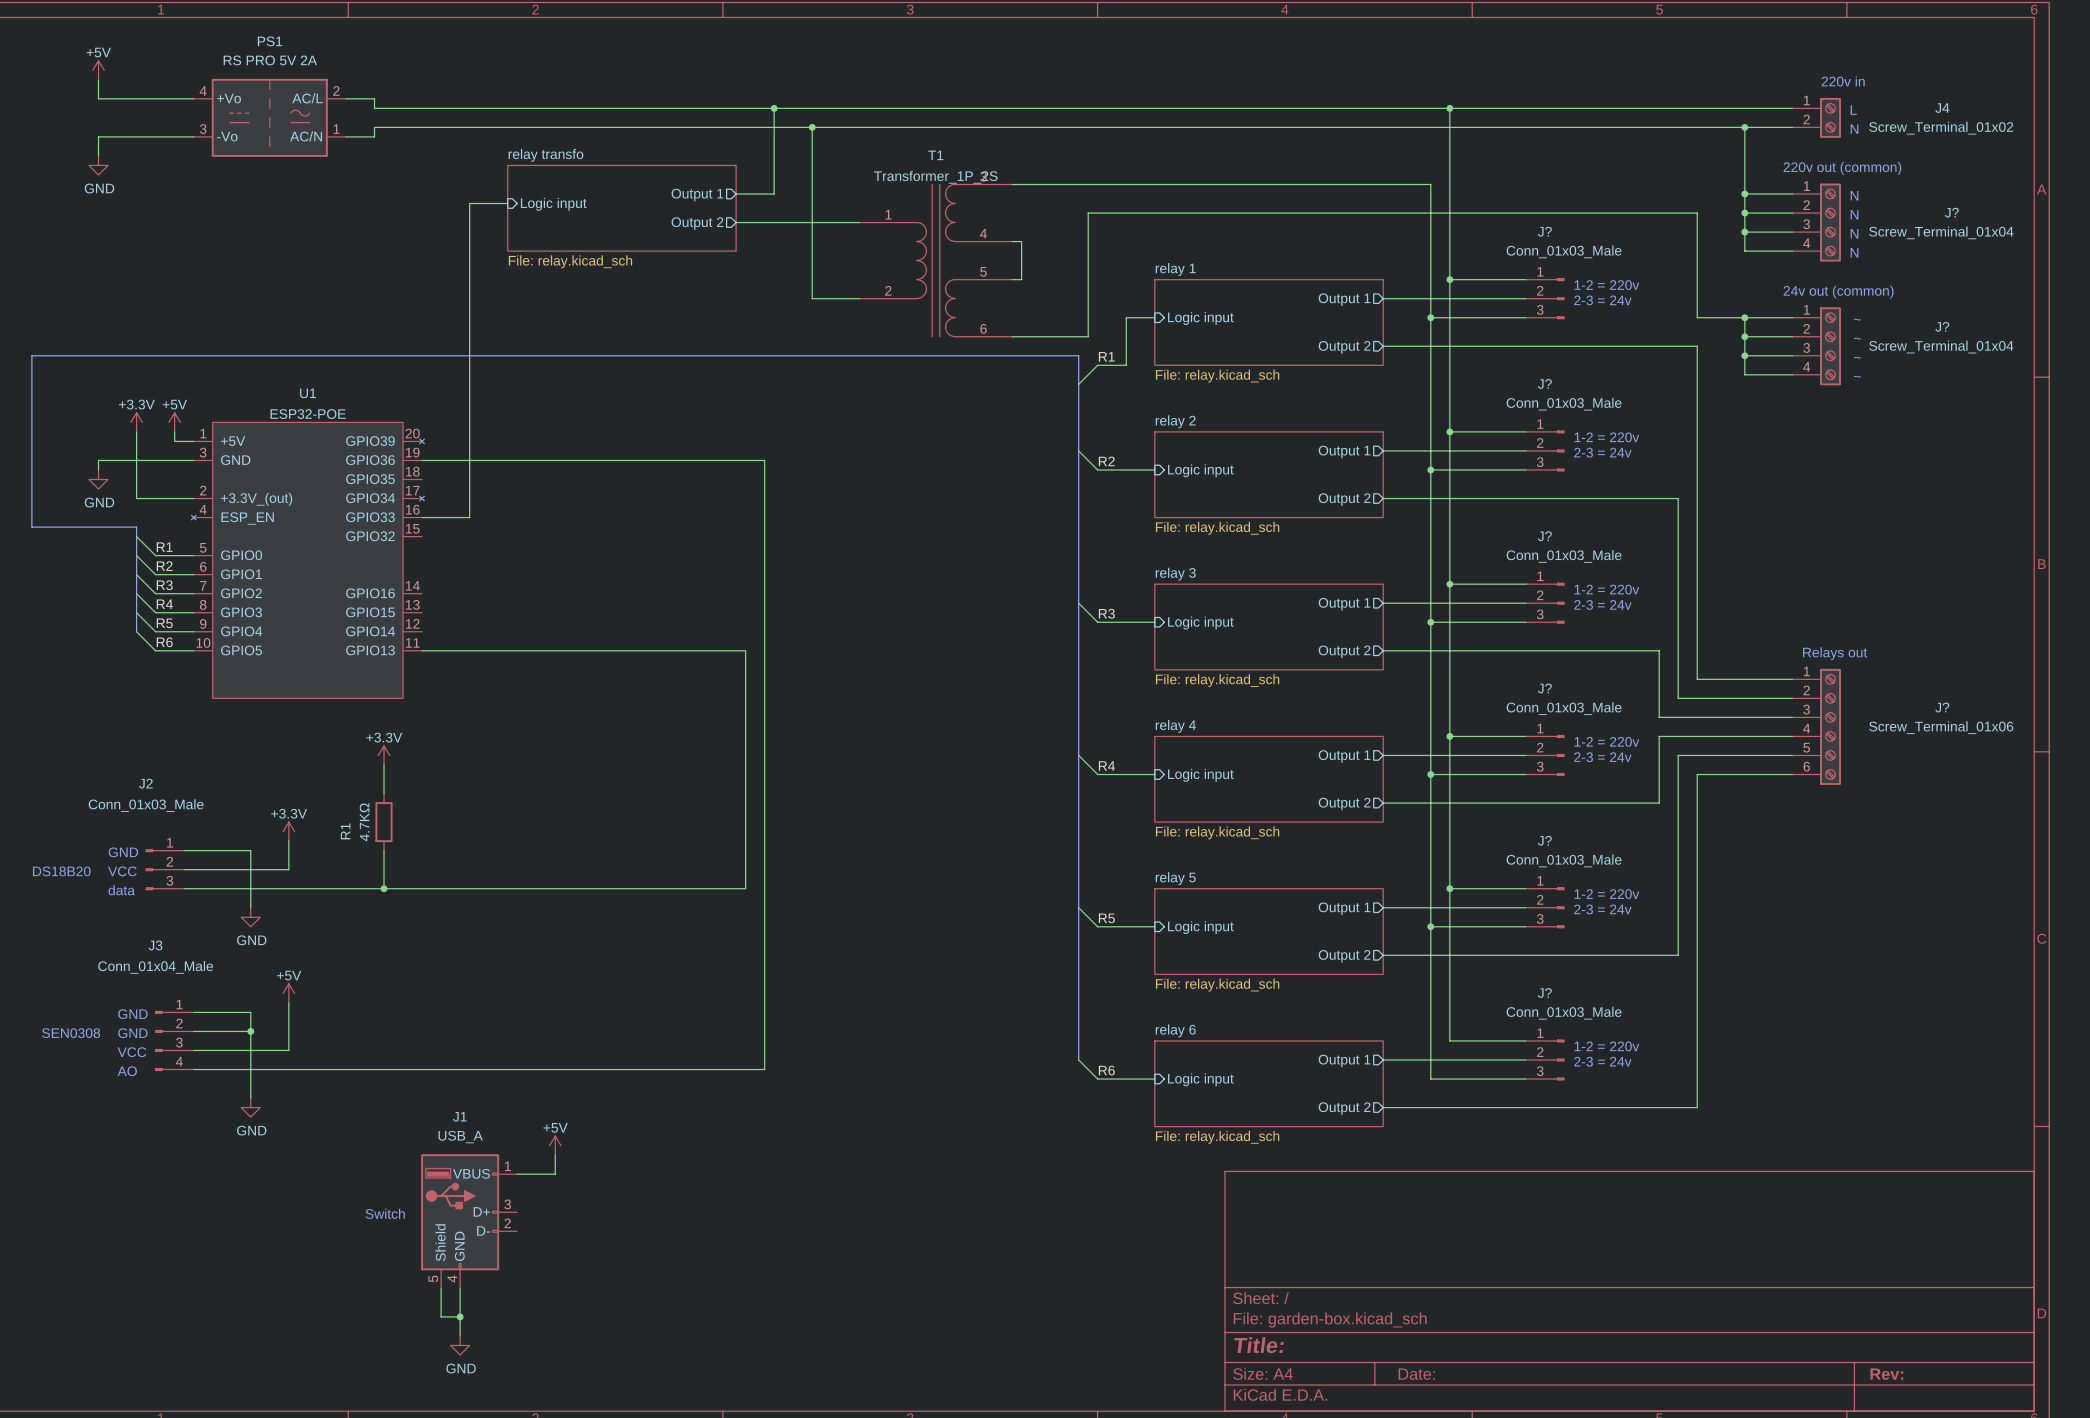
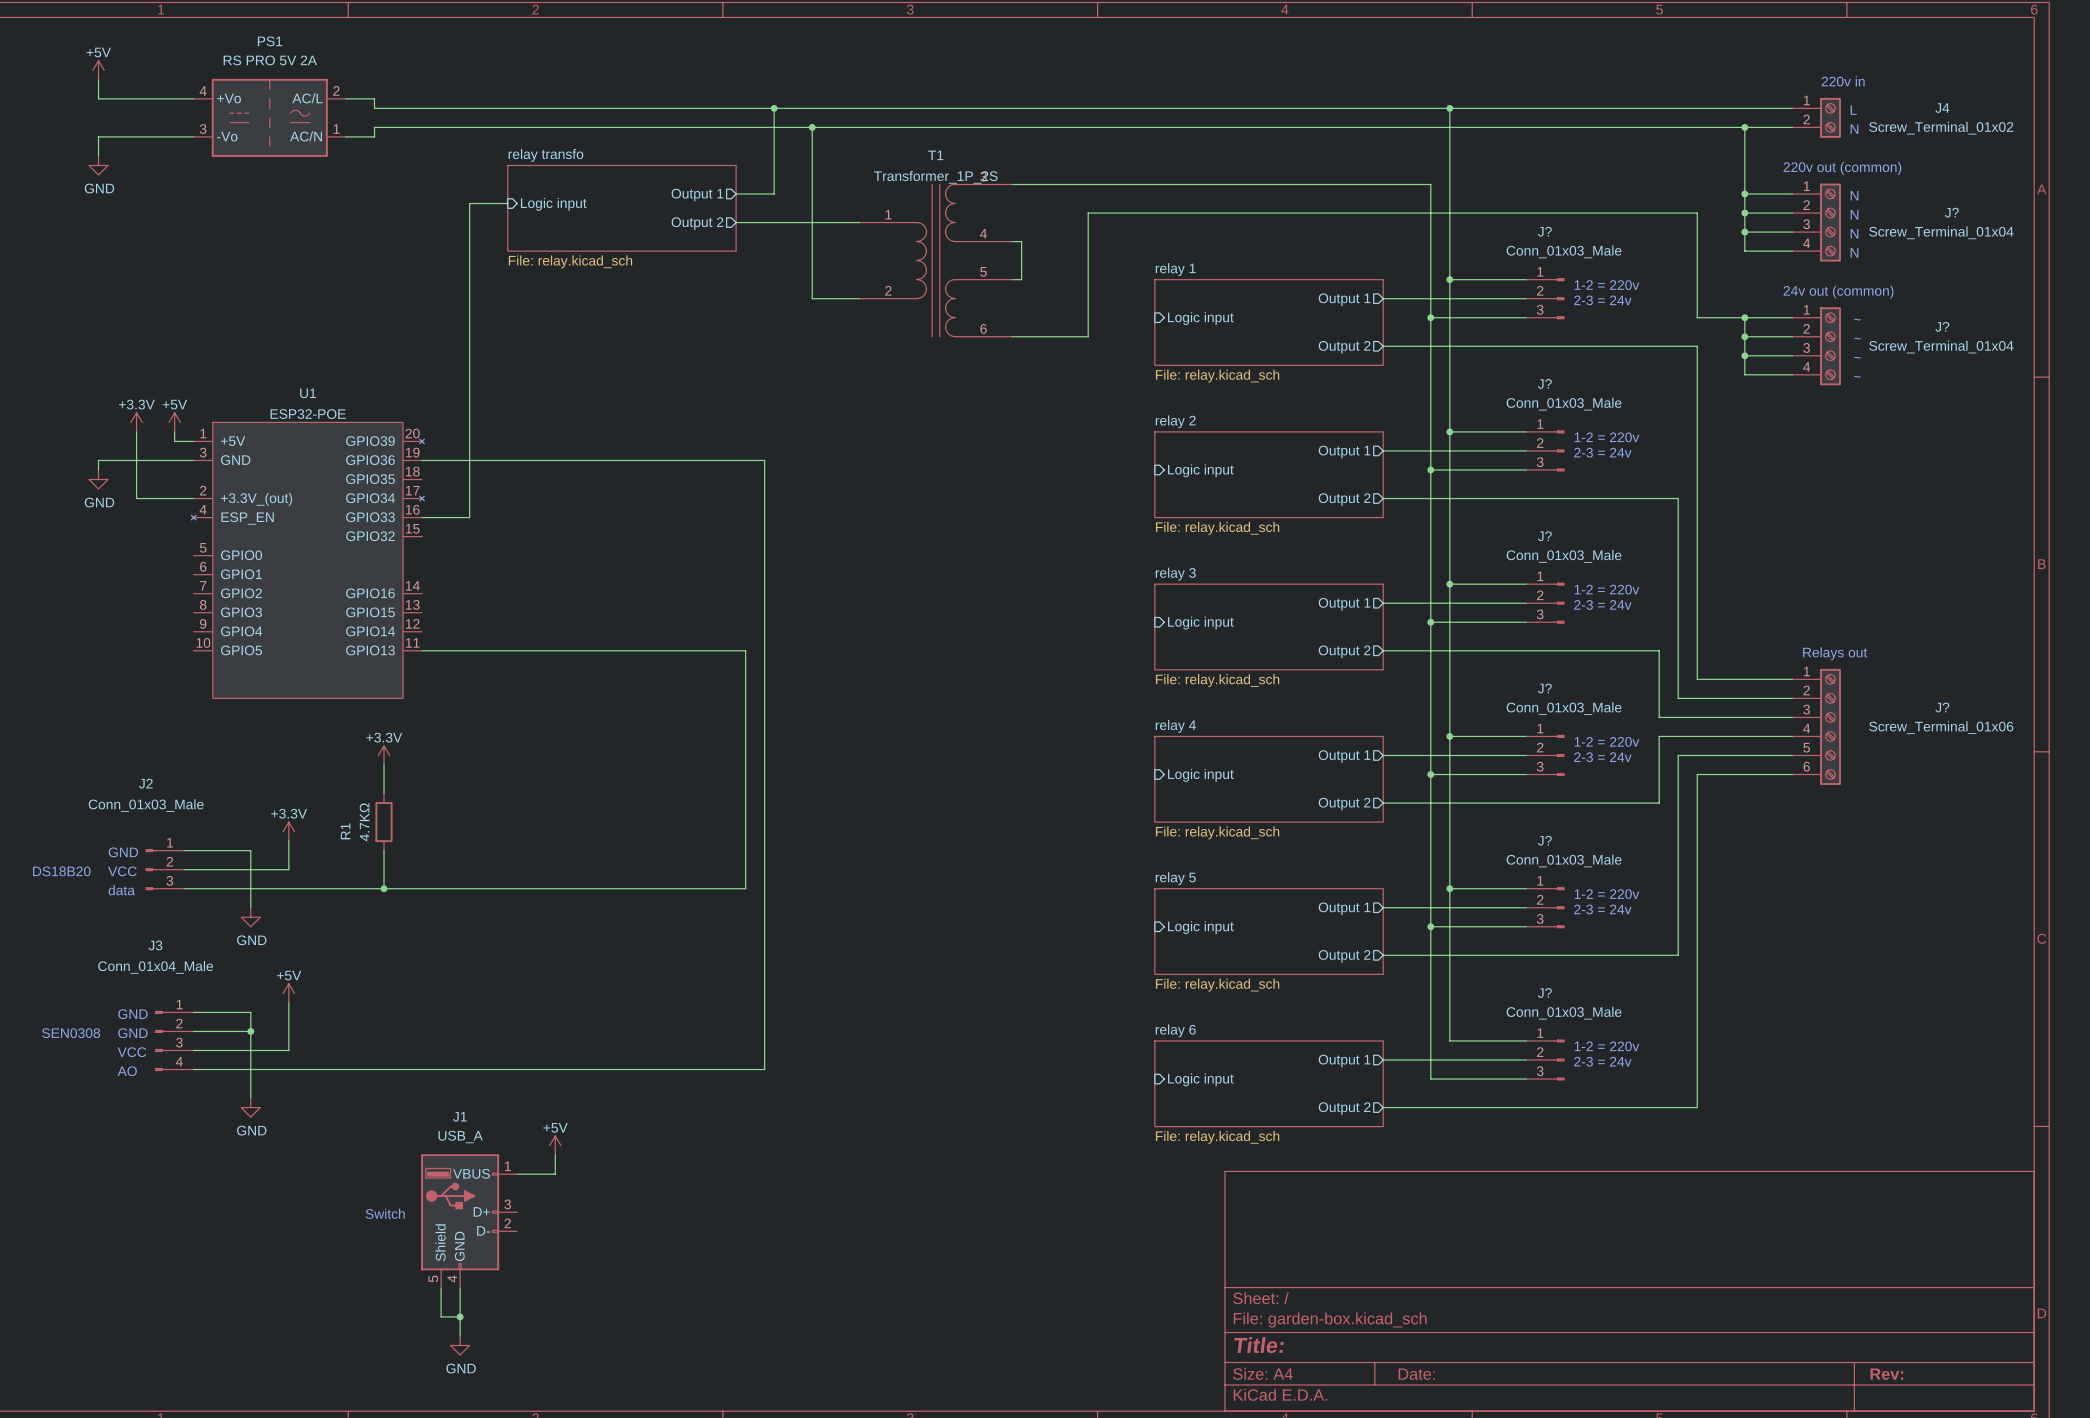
wire: (1154, 317) (1126, 317) (1126, 365) (1097, 365) (1078, 384) -> none
label: R1 (1106, 356) -> none
wire: (1078, 450) (1097, 469) (1154, 469) -> none
label: R2 (1106, 461) -> none
wire: (136, 536) (155, 555) (193, 555) -> none
label: R1 (164, 547) -> none
wire: (136, 555) (155, 574) (193, 574) -> none
label: R2 (164, 566) -> none
wire: (136, 574) (155, 593) (193, 593) -> none
label: R3 (164, 585) -> none
wire: (136, 593) (155, 612) (193, 612) -> none
wire: (1078, 603) (1097, 622) (1154, 622) -> none
label: R4 (164, 604) -> none
wire: (136, 612) (155, 631) (193, 631) -> none
label: R3 (1106, 613) -> none
label: R5 (164, 623) -> none
wire: (136, 631) (155, 650) (193, 650) -> none
bus: (136, 631) (136, 527) (31, 527) (31, 355) (1078, 355) (1078, 1060) -> none
label: R6 (164, 642) -> none
wire: (1078, 755) (1097, 774) (1154, 774) -> none
label: R4 (1106, 766) -> none
wire: (1078, 907) (1097, 926) (1154, 926) -> none
label: R5 (1106, 918) -> none
wire: (1078, 1060) (1097, 1079) (1154, 1079) -> none
label: R6 (1106, 1070) -> none

